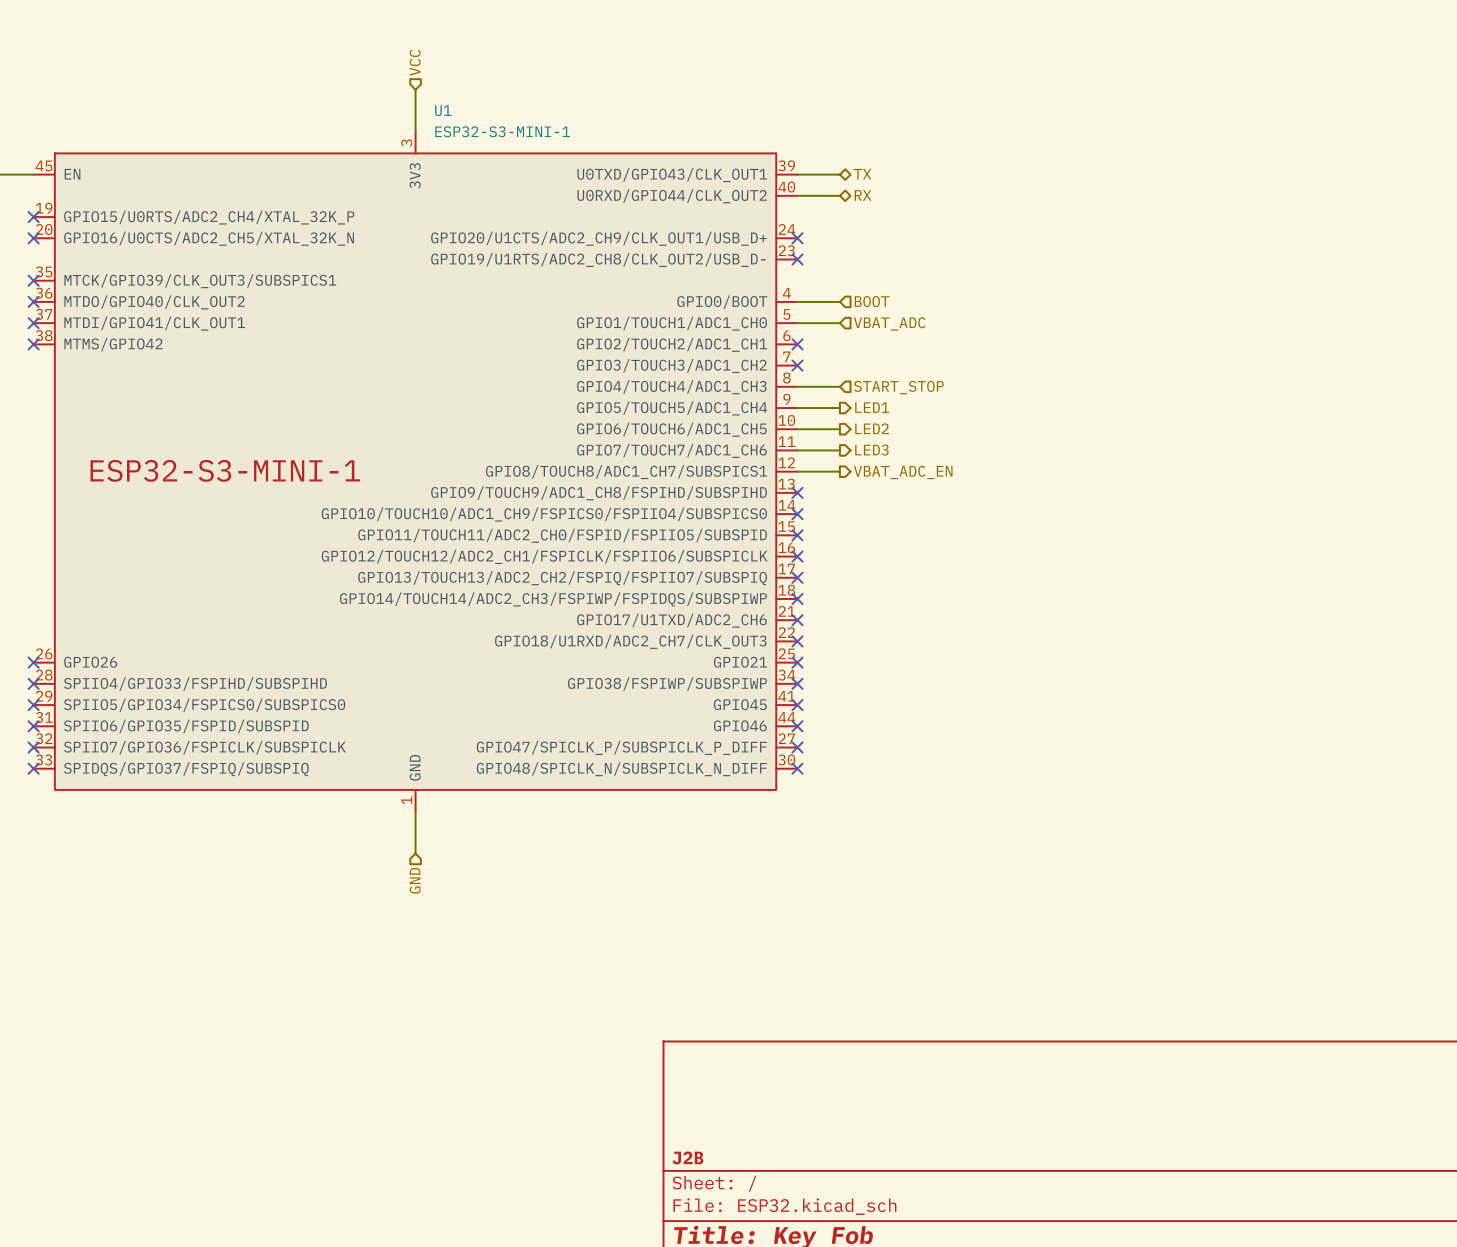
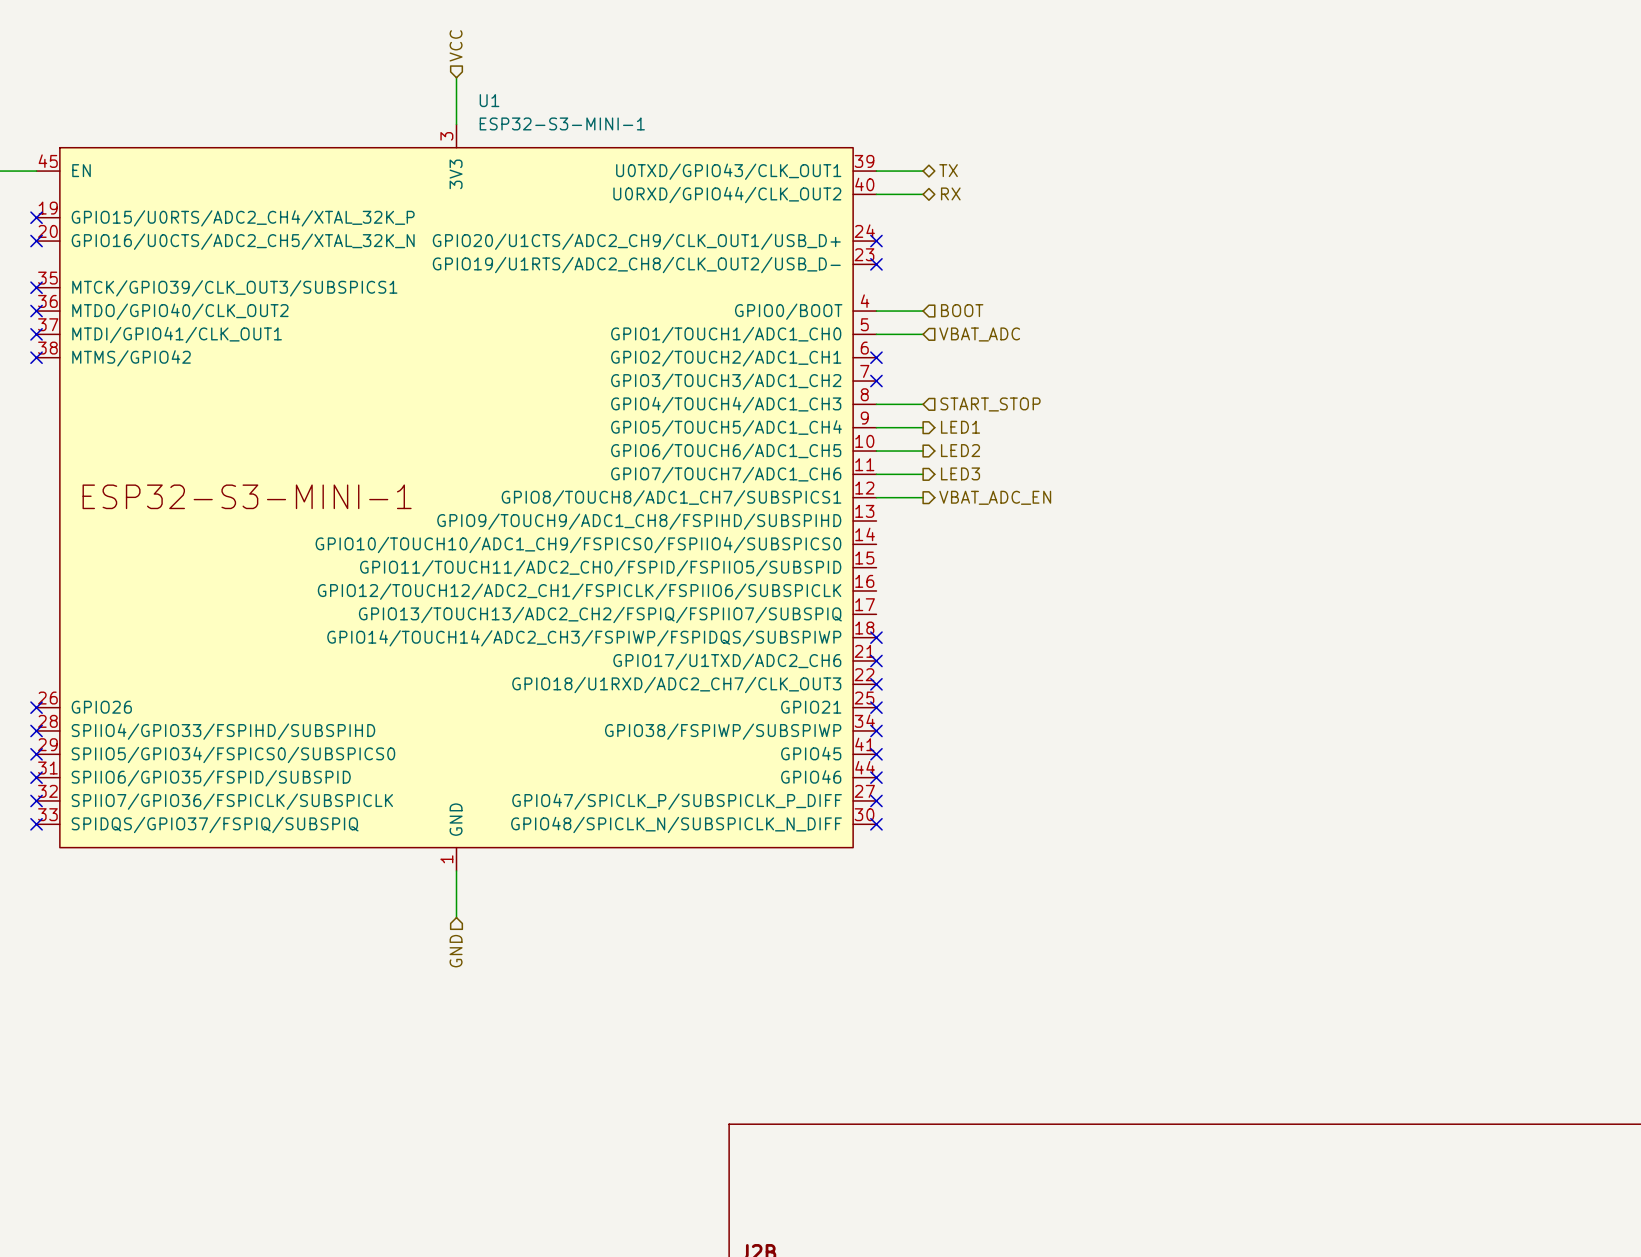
no-connect mark: (797, 492) -> none
no-connect mark: (797, 514) -> none
no-connect mark: (797, 535) -> none
no-connect mark: (797, 556) -> none
no-connect mark: (797, 577) -> none

